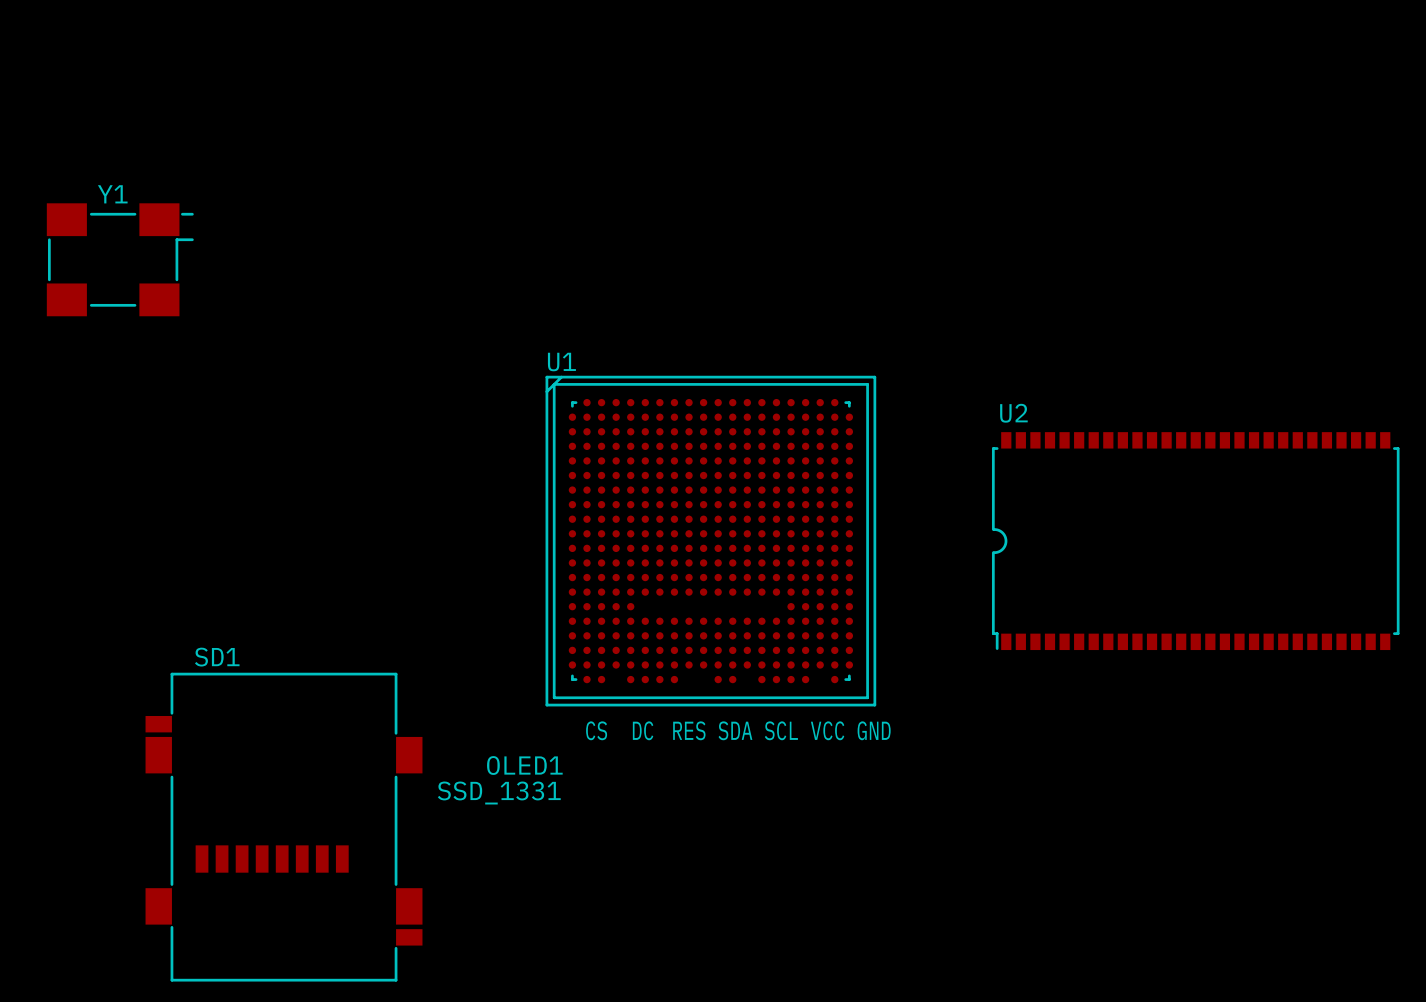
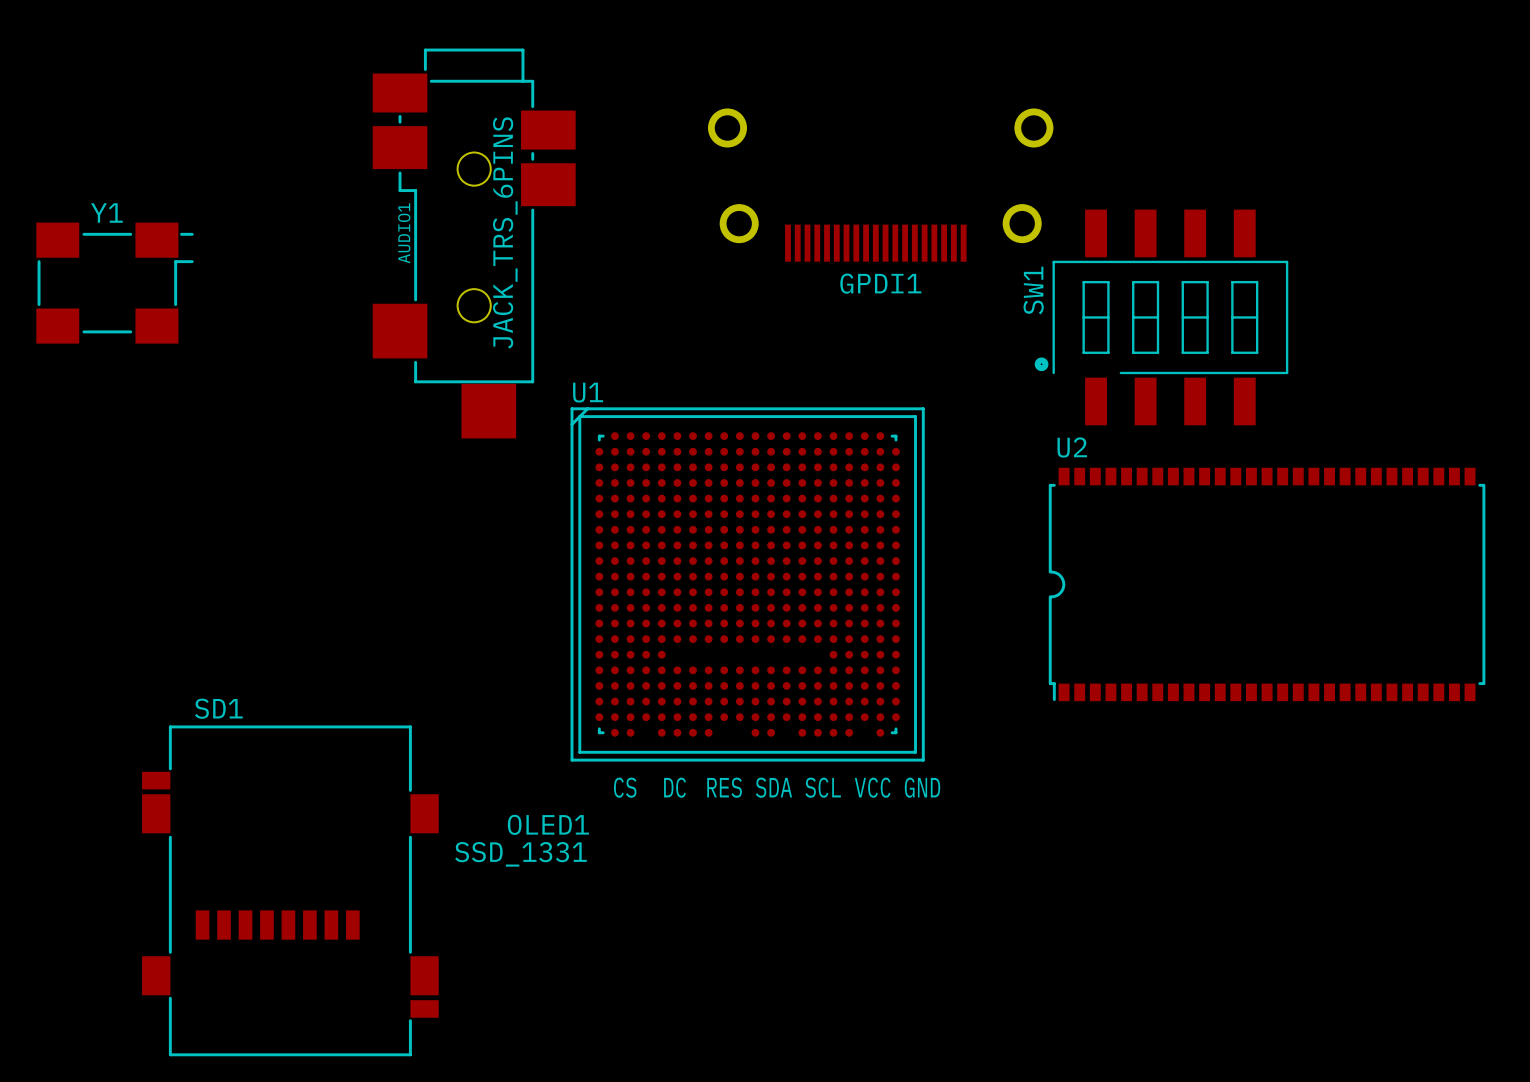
GPDI1: none -> (880, 185)
AUDIO1: none -> JACK_TRS_6PINS (474, 243)
SW1: none -> (1161, 317)

